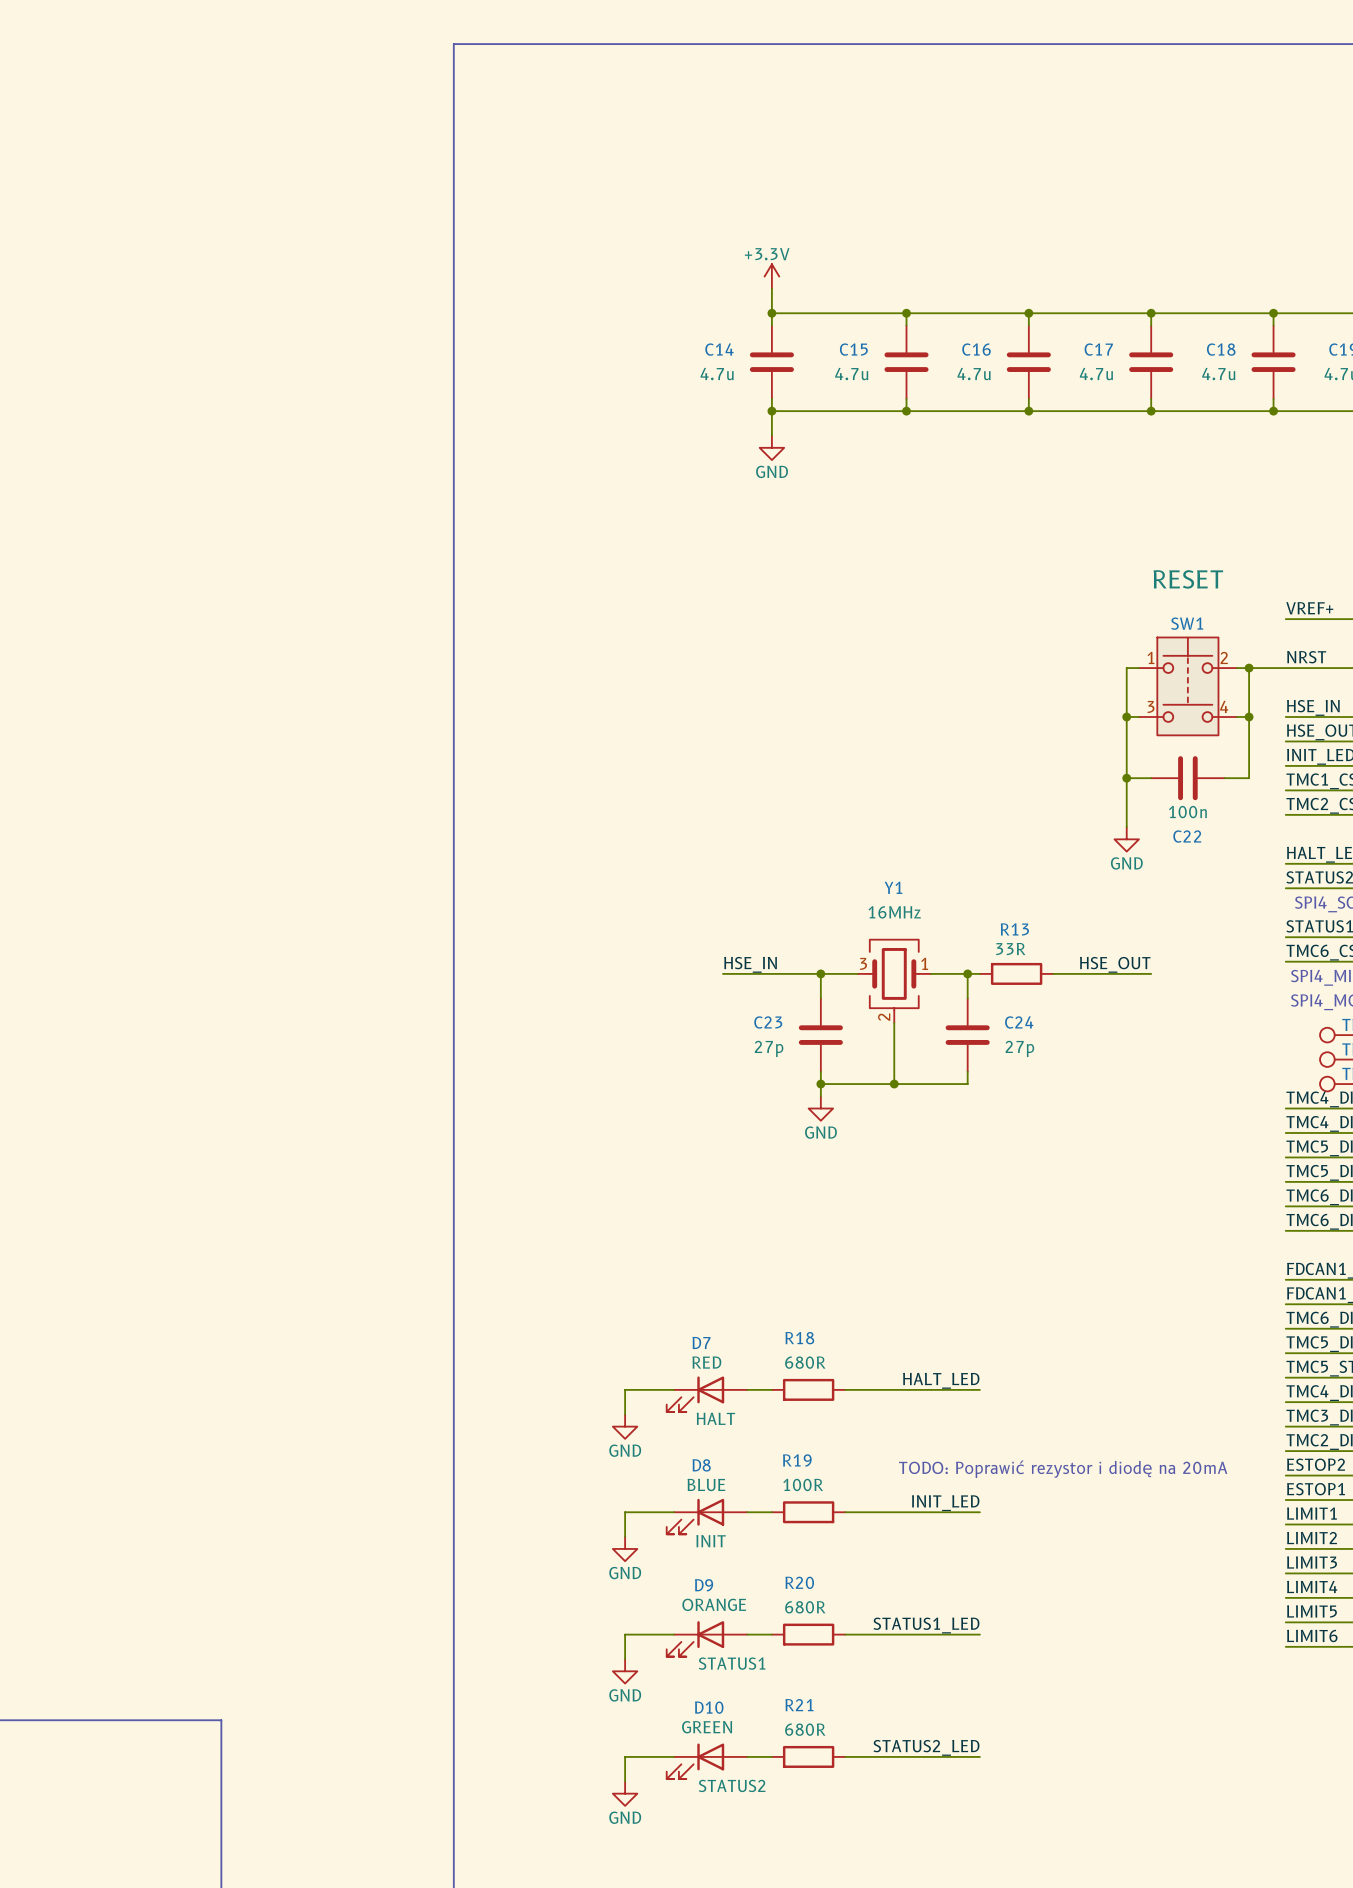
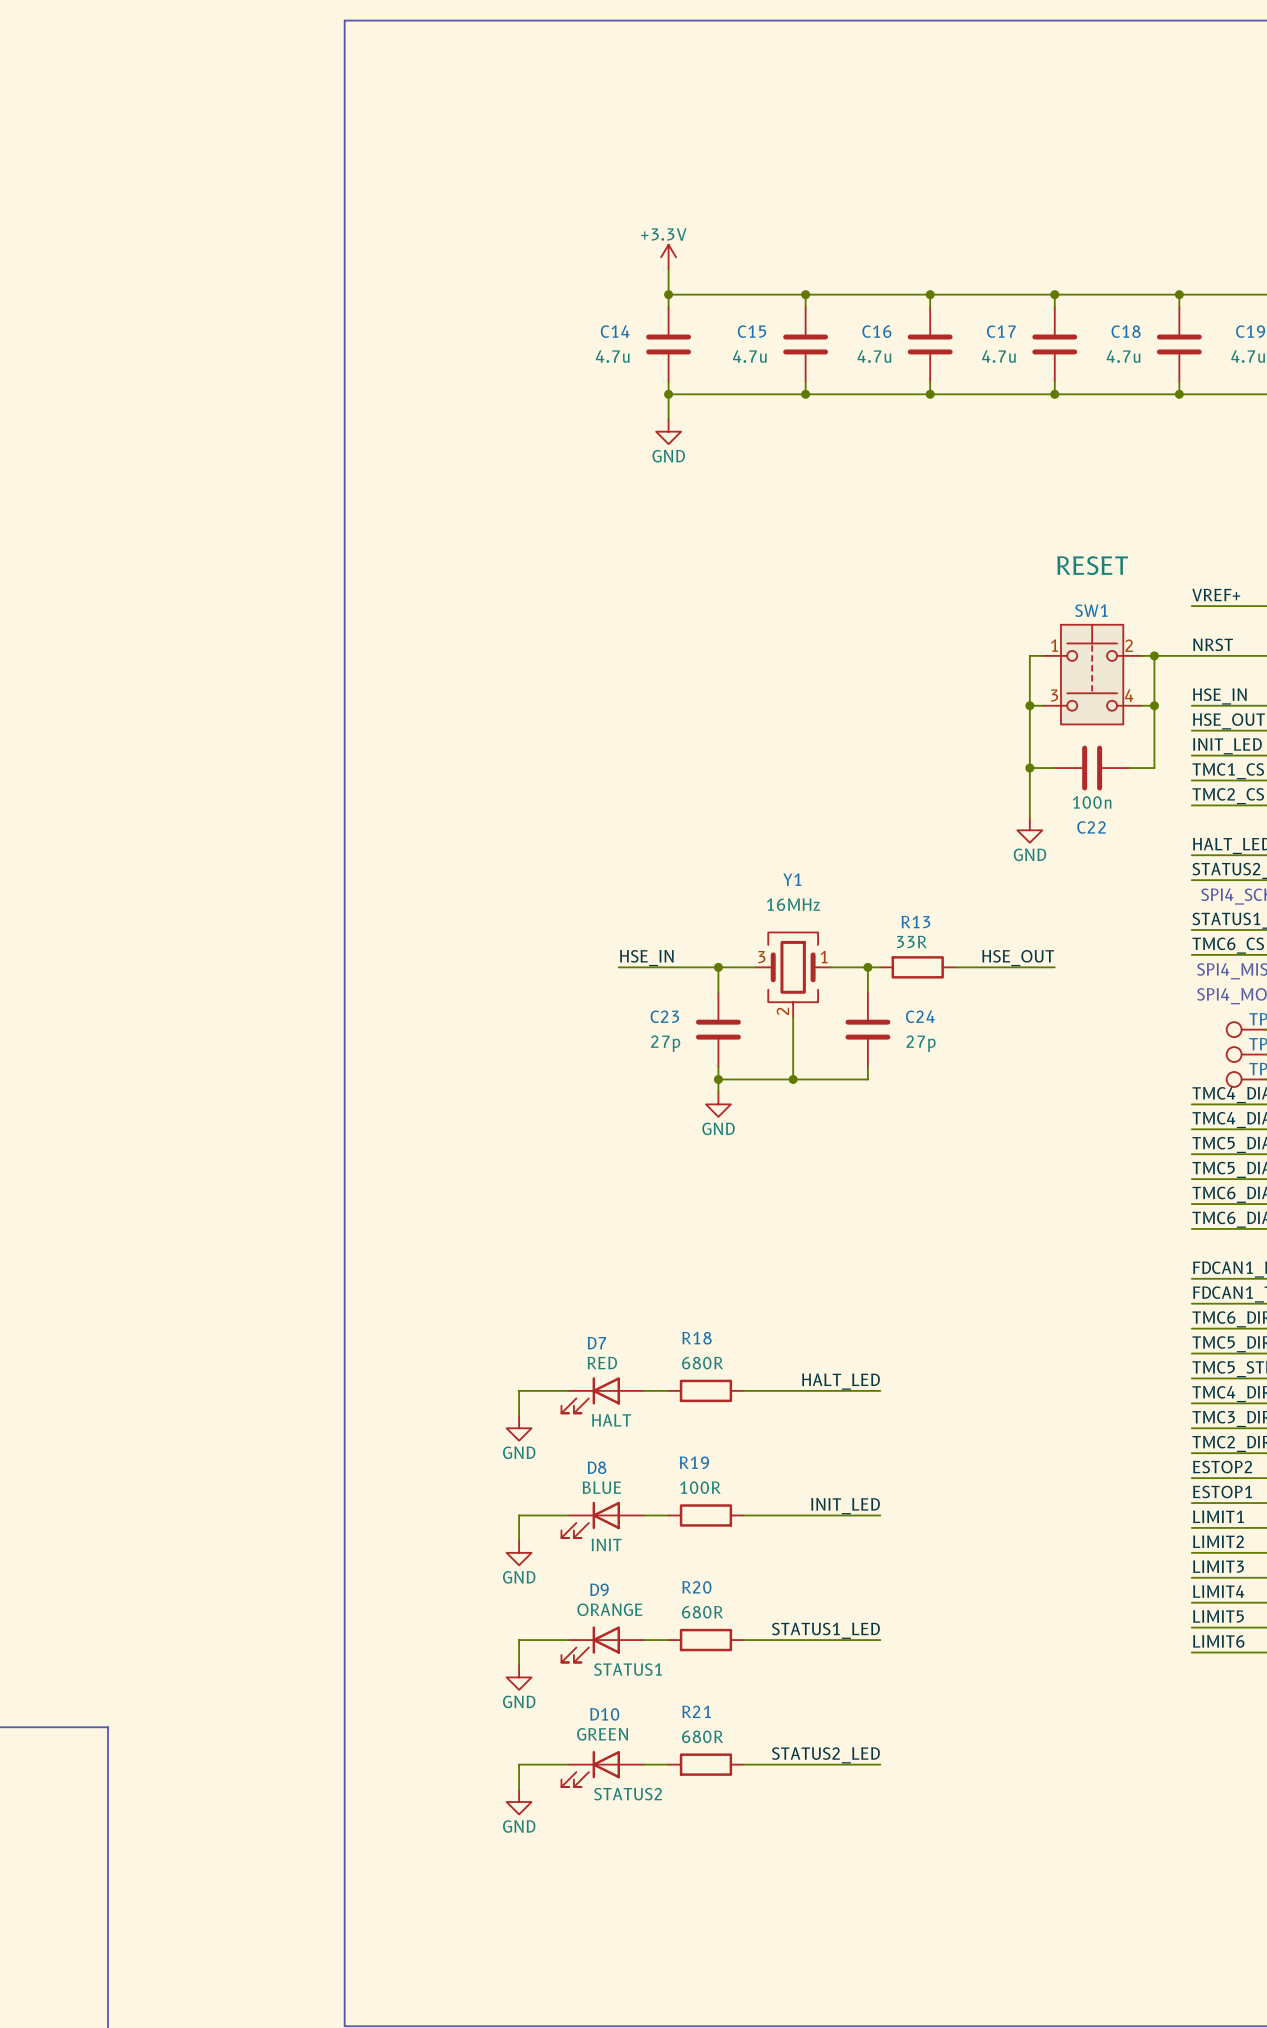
text: TODO: Poprawić rezystor i diodę na 20mA (1063, 1469) -> none

